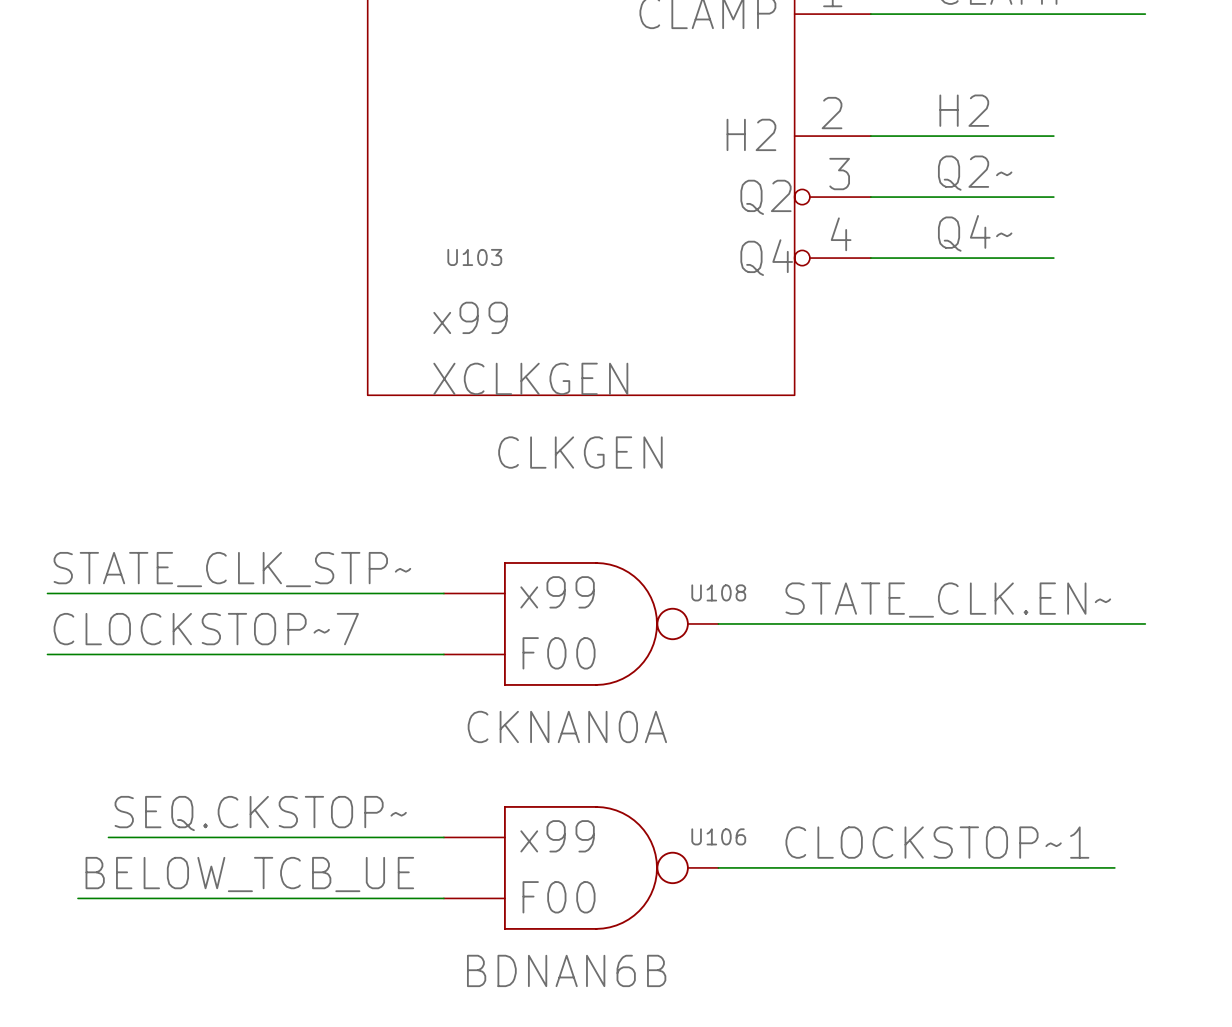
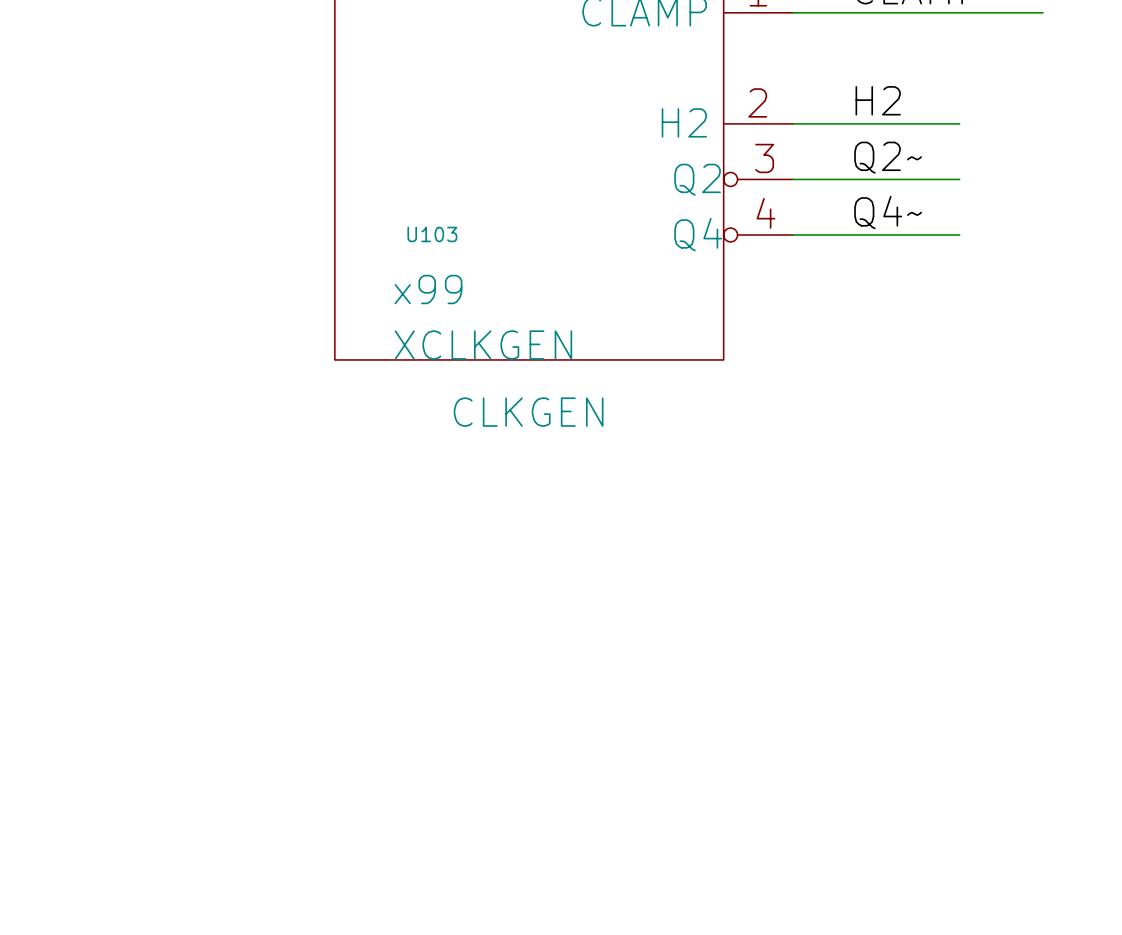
label: STATE_CLK_STP~ (232, 569) -> none
wire: (47, 593) (443, 593) -> none
label: STATE_CLK.EN~ (948, 600) -> none
U108: F00 (581, 623) -> none
wire: (718, 623) (1145, 623) -> none
label: CLOCKSTOP~7 (206, 629) -> none
wire: (47, 654) (443, 654) -> none
label: SEQ.CKSTOP~ (260, 813) -> none
wire: (108, 837) (443, 837) -> none
label: CLOCKSTOP~1 (937, 842) -> none
U106: F00 (581, 867) -> none
wire: (718, 867) (1114, 867) -> none
label: BELOW_TCB_UE (249, 874) -> none
wire: (77, 898) (443, 898) -> none

